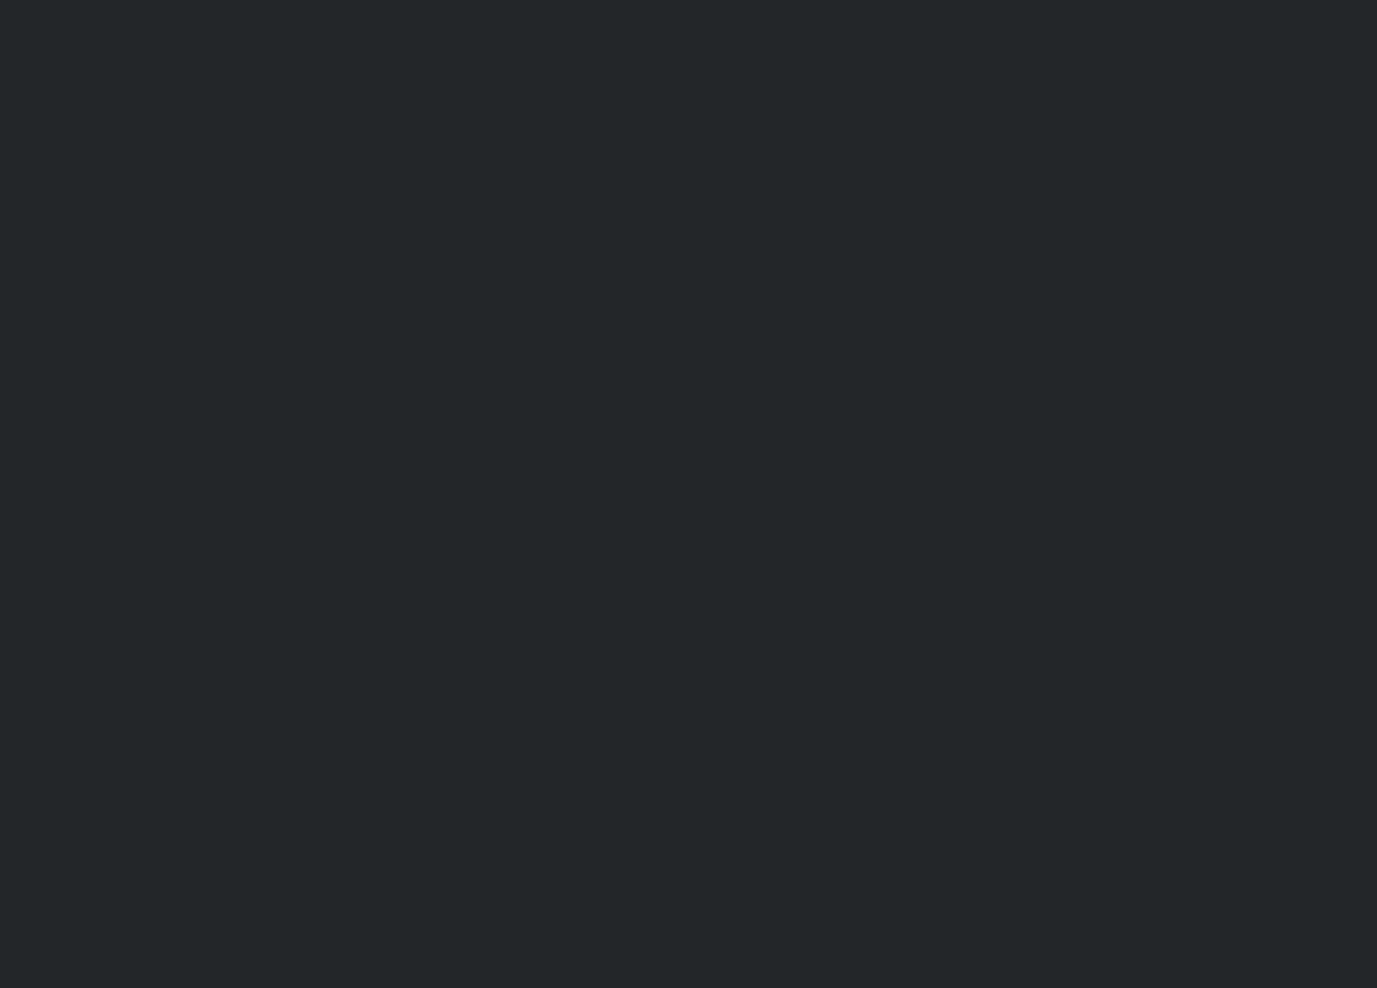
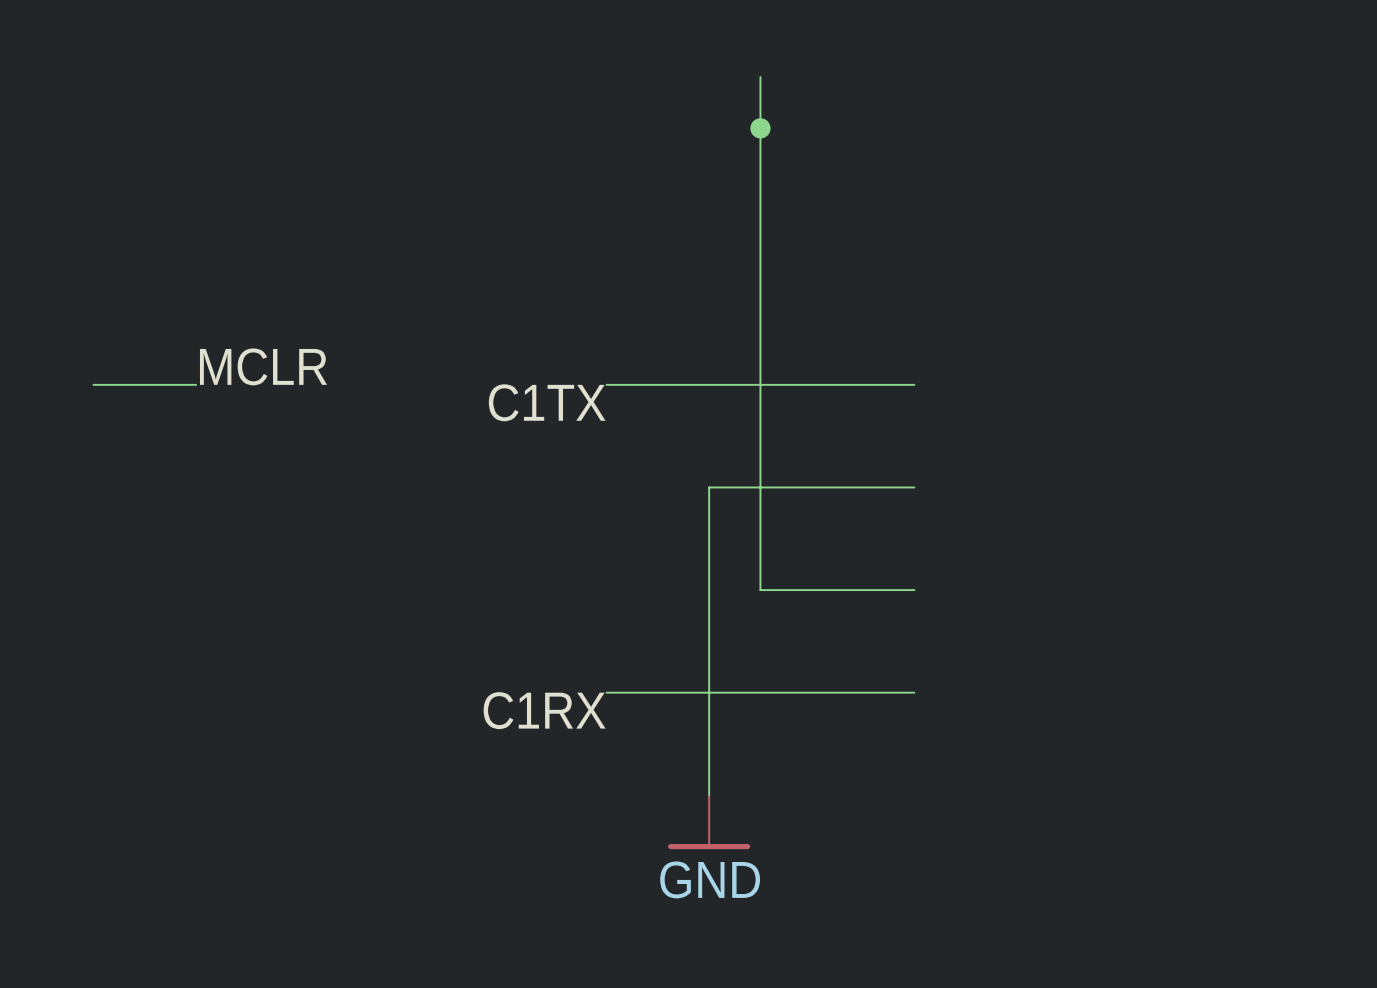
wire: none -> (760, 77) (760, 590) (914, 590)
junction: none -> (760, 128)
label: none -> MCLR (263, 366)
wire: none -> (93, 384) (196, 384)
wire: none -> (606, 384) (914, 384)
label: none -> C1TX (547, 402)
wire: none -> (914, 487) (709, 487) (709, 795)
wire: none -> (606, 692) (914, 692)
label: none -> C1RX (544, 710)
power symbol: none -> GND (709, 822)

